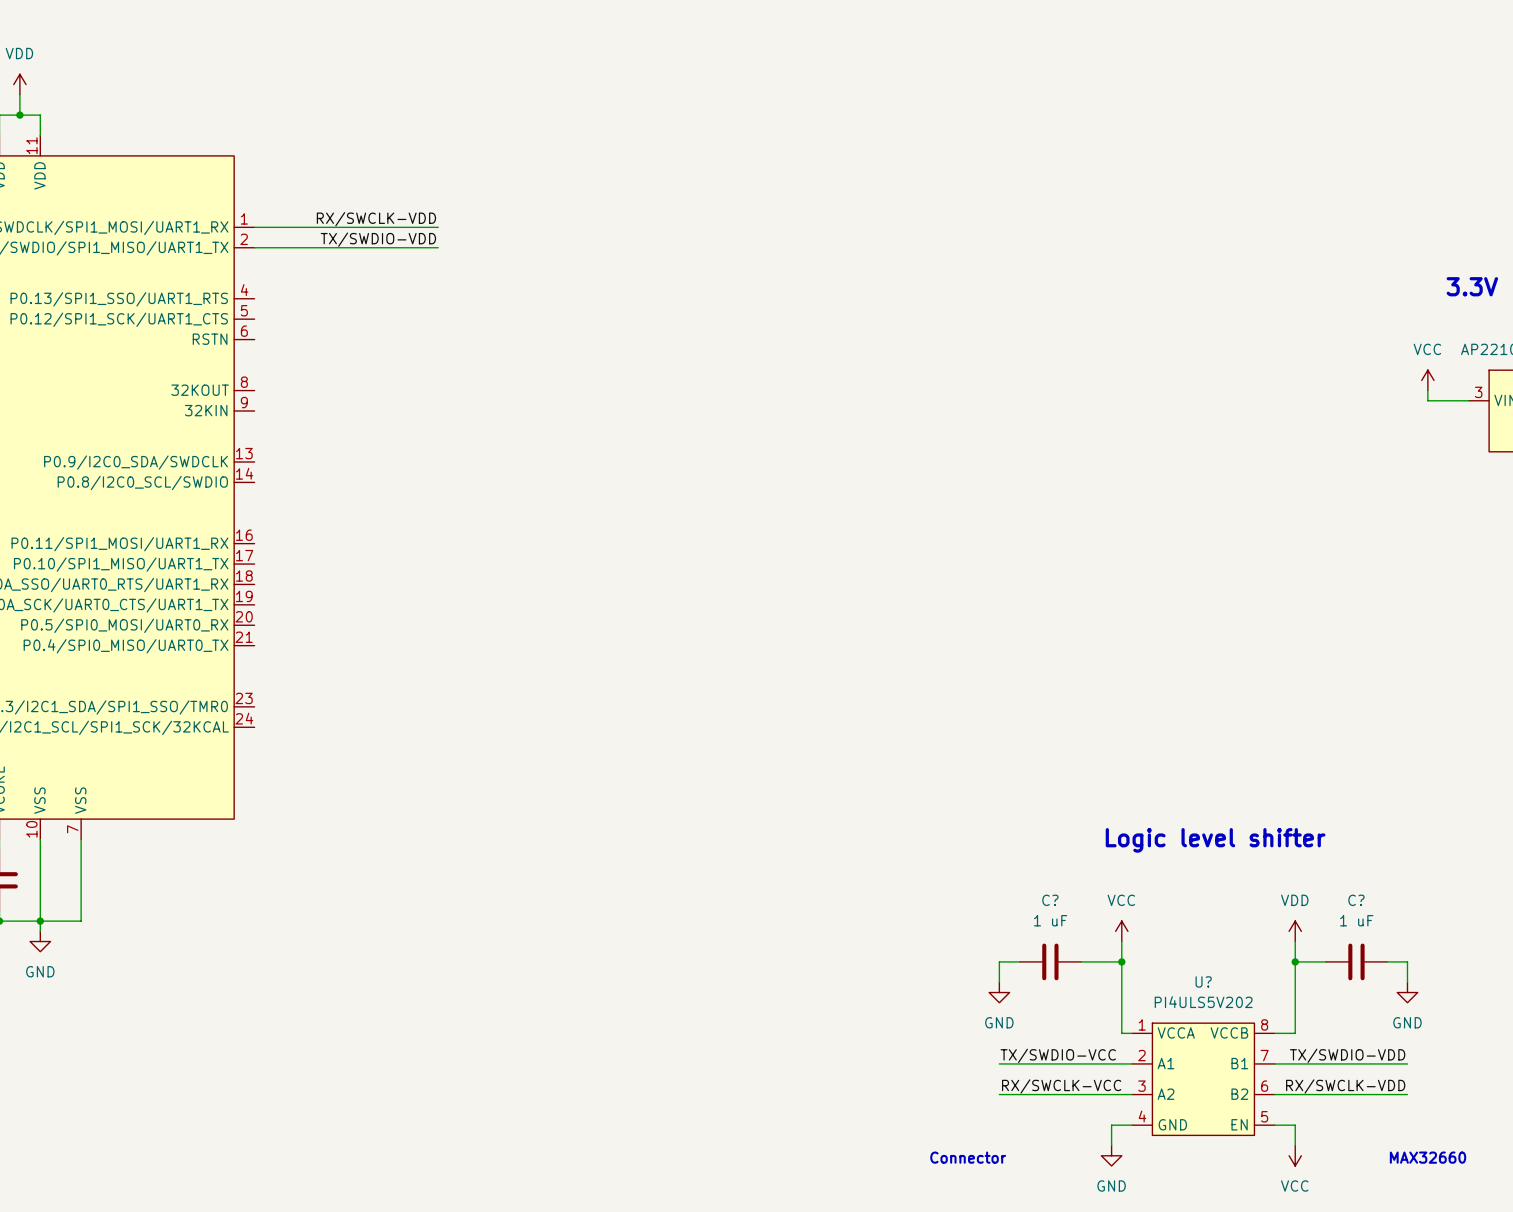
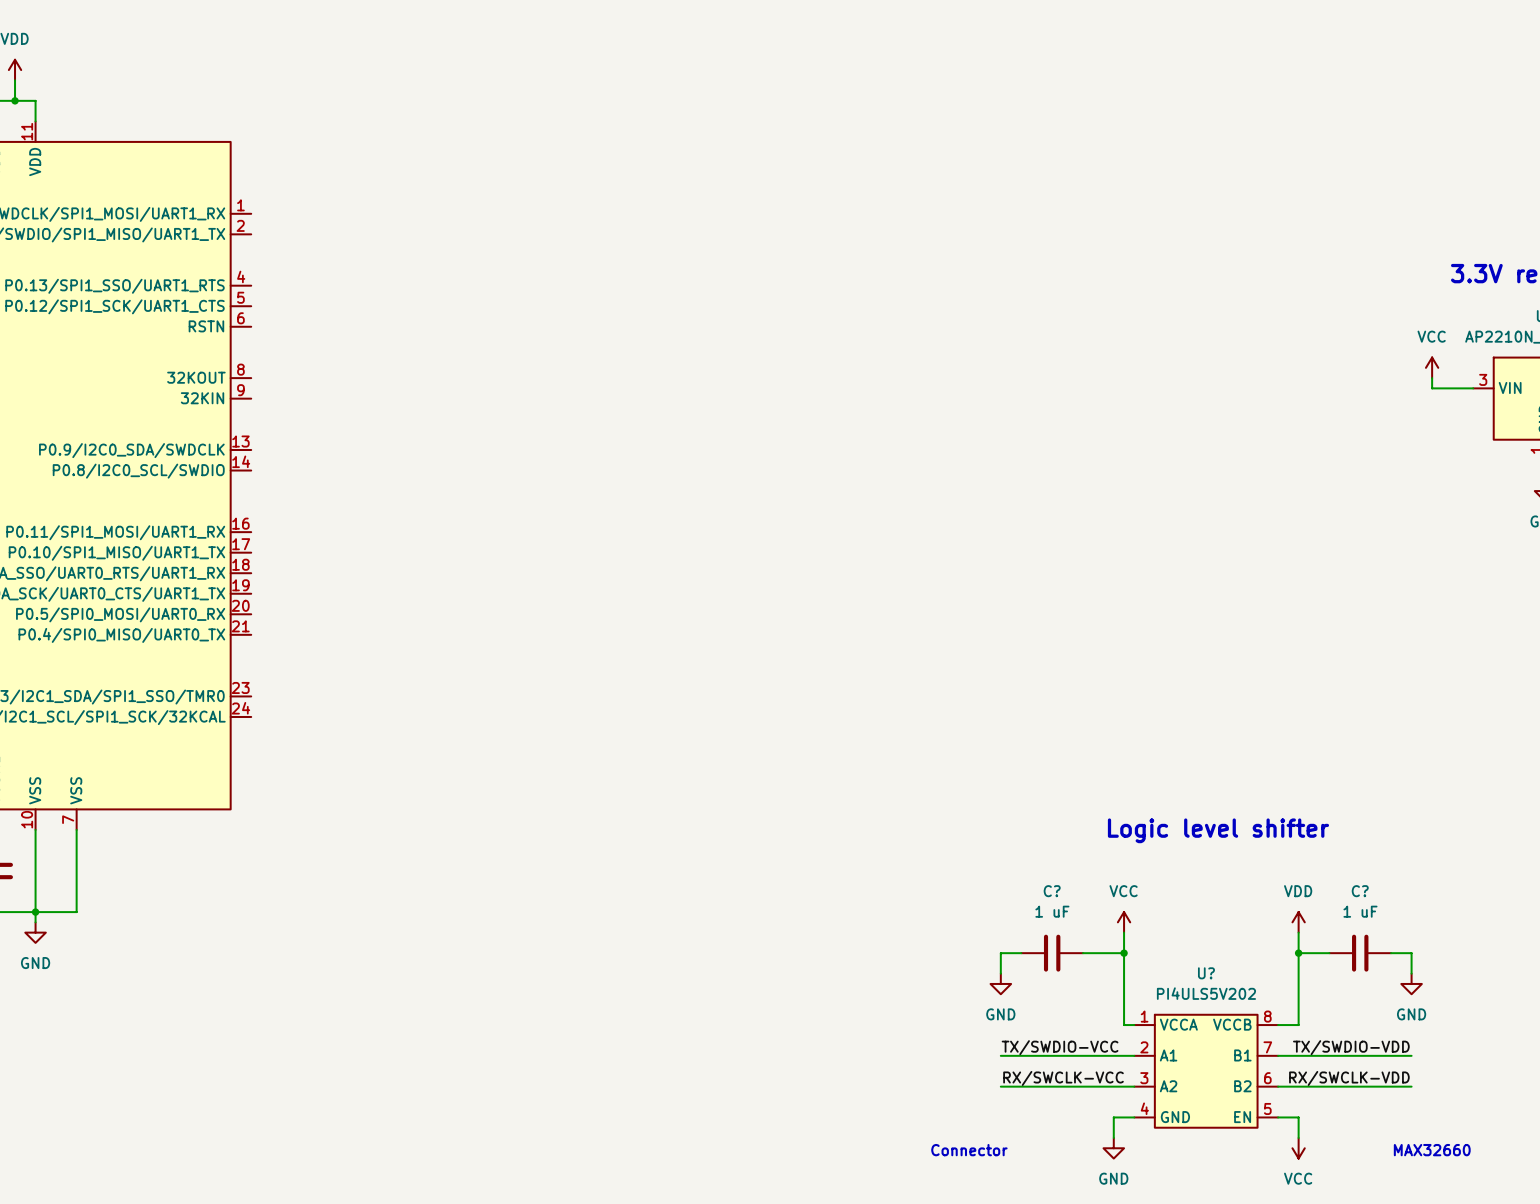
label: RX/SWCLK-VDD (376, 219) -> none
wire: (254, 227) (438, 227) -> none
label: TX/SWDIO-VDD (378, 239) -> none
wire: (254, 247) (438, 247) -> none

